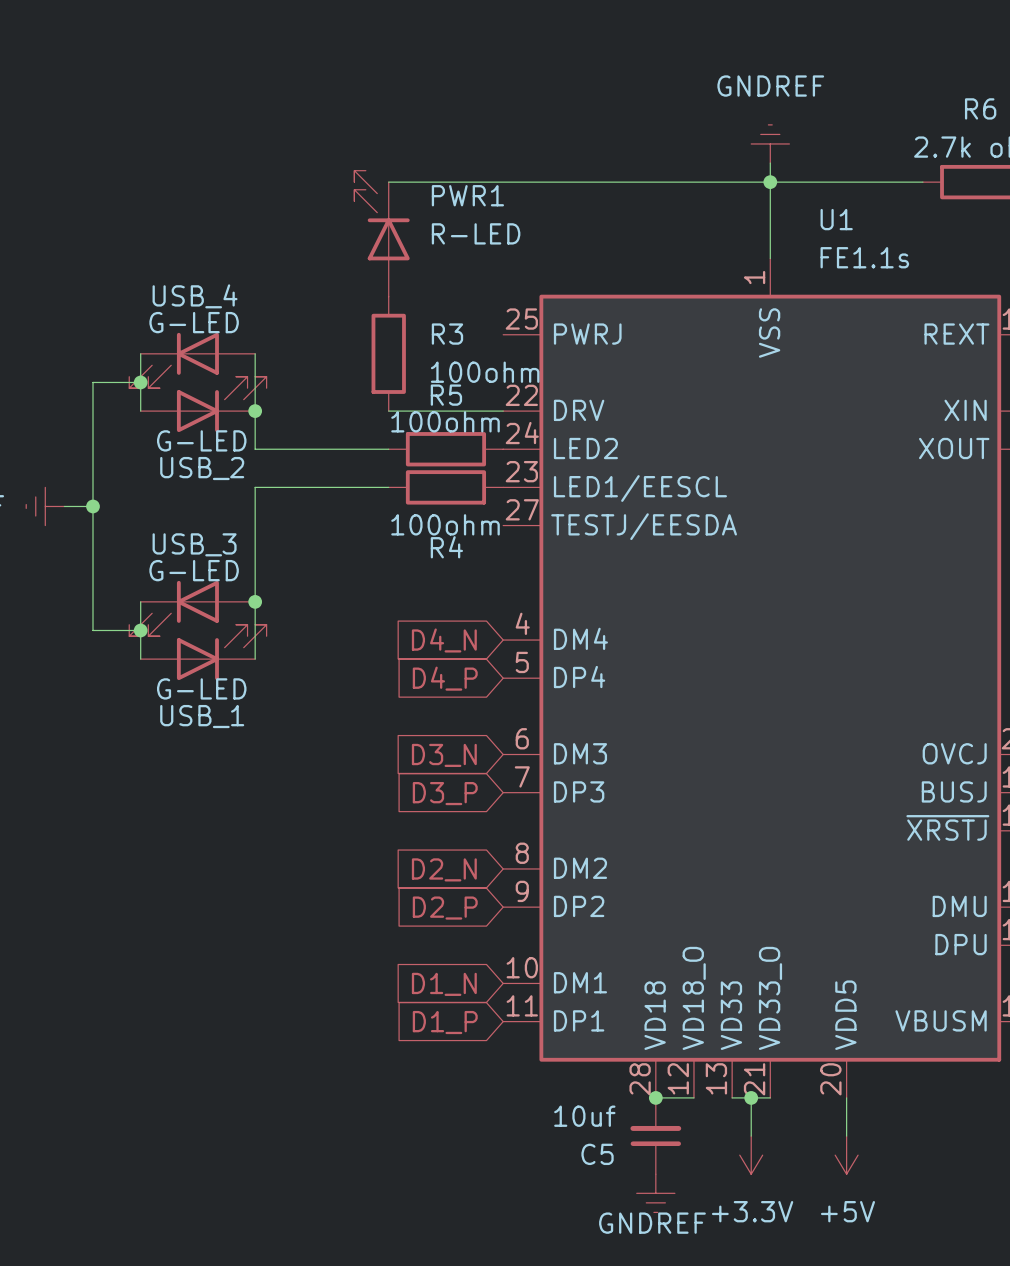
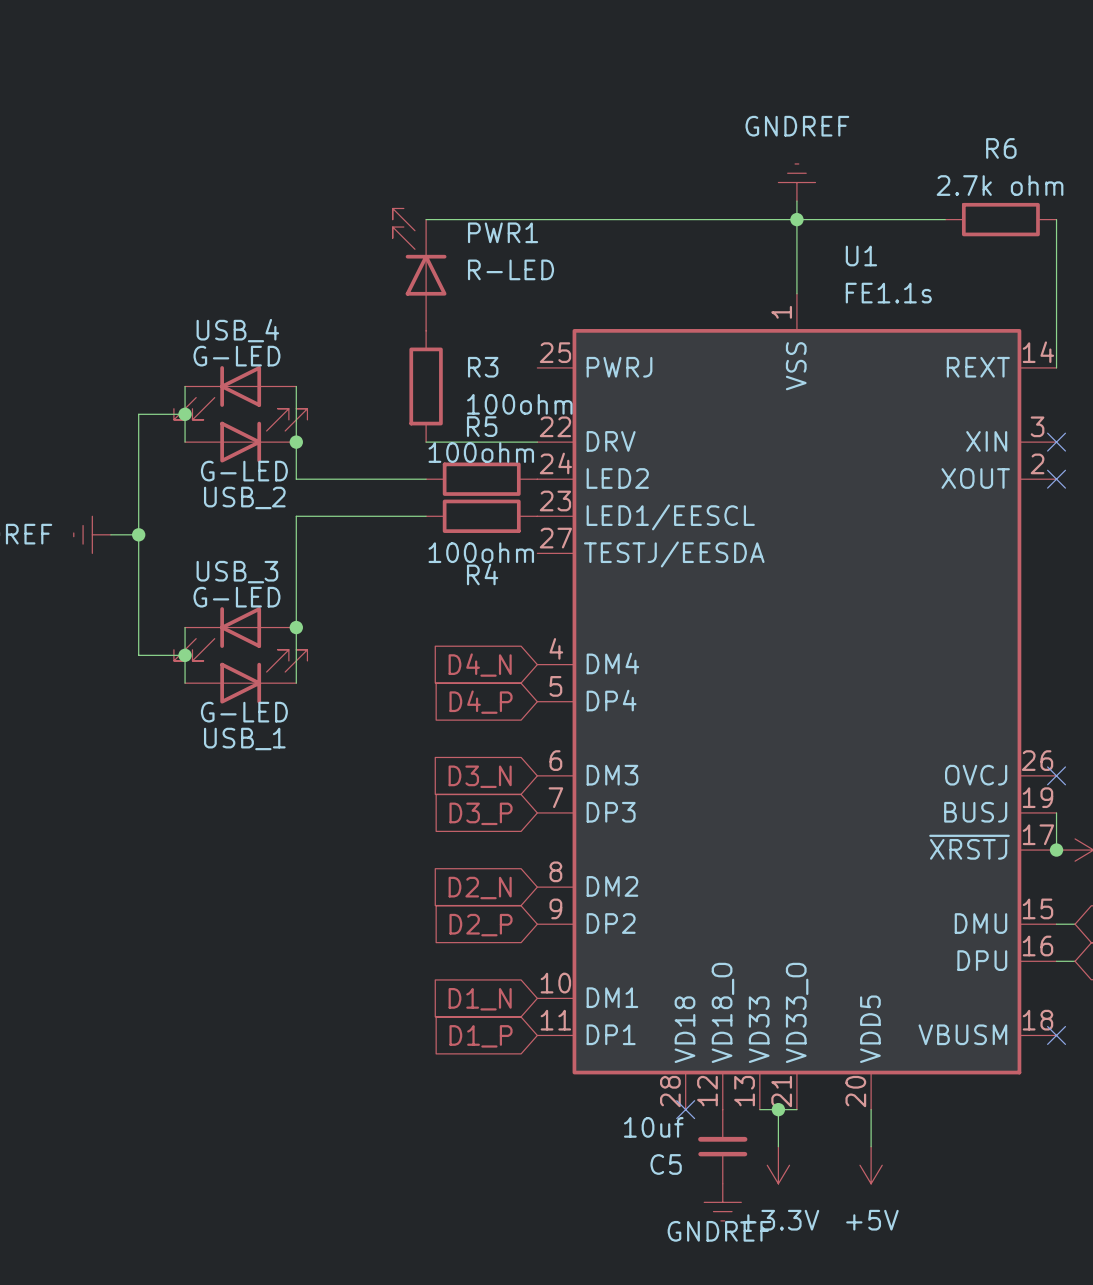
wire: (655, 1097) (693, 1097) -> none
junction: (655, 1097) -> none
no-connect mark: none -> (685, 1109)
C5 position: (655, 1136) -> (722, 1146)
power symbol position: GNDREF (655, 1193) -> GNDREF (722, 1202)

